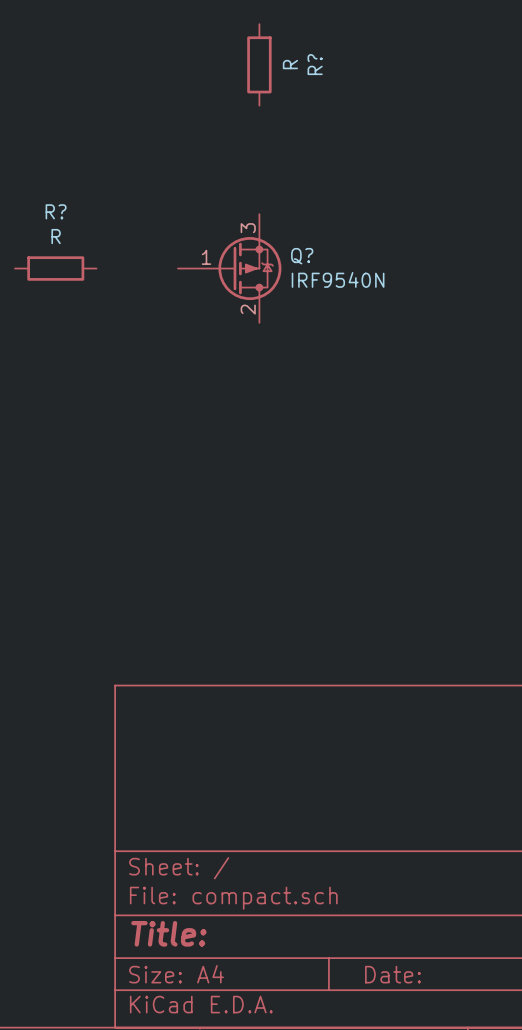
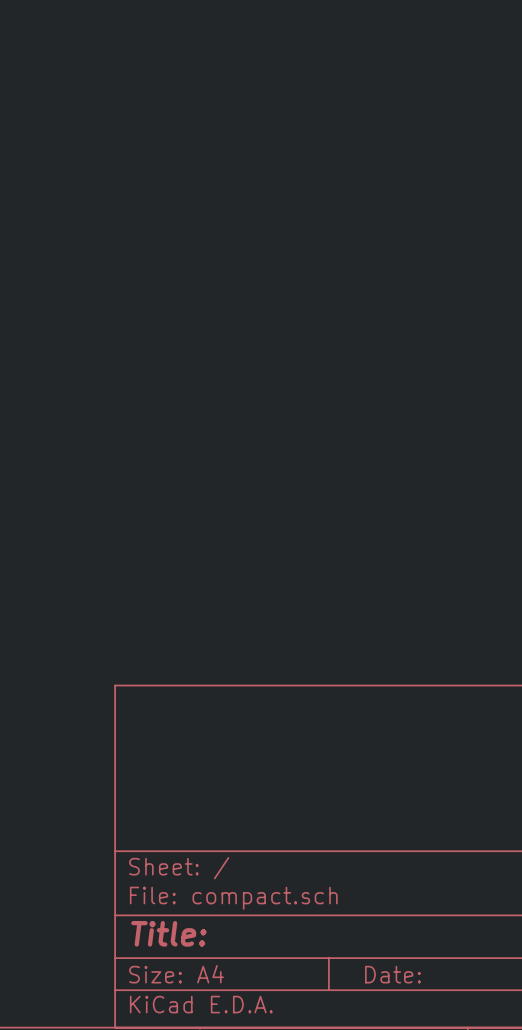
R?: R (259, 64) -> none
R?: R (55, 268) -> none
Q?: IRF9540N (229, 268) -> none

